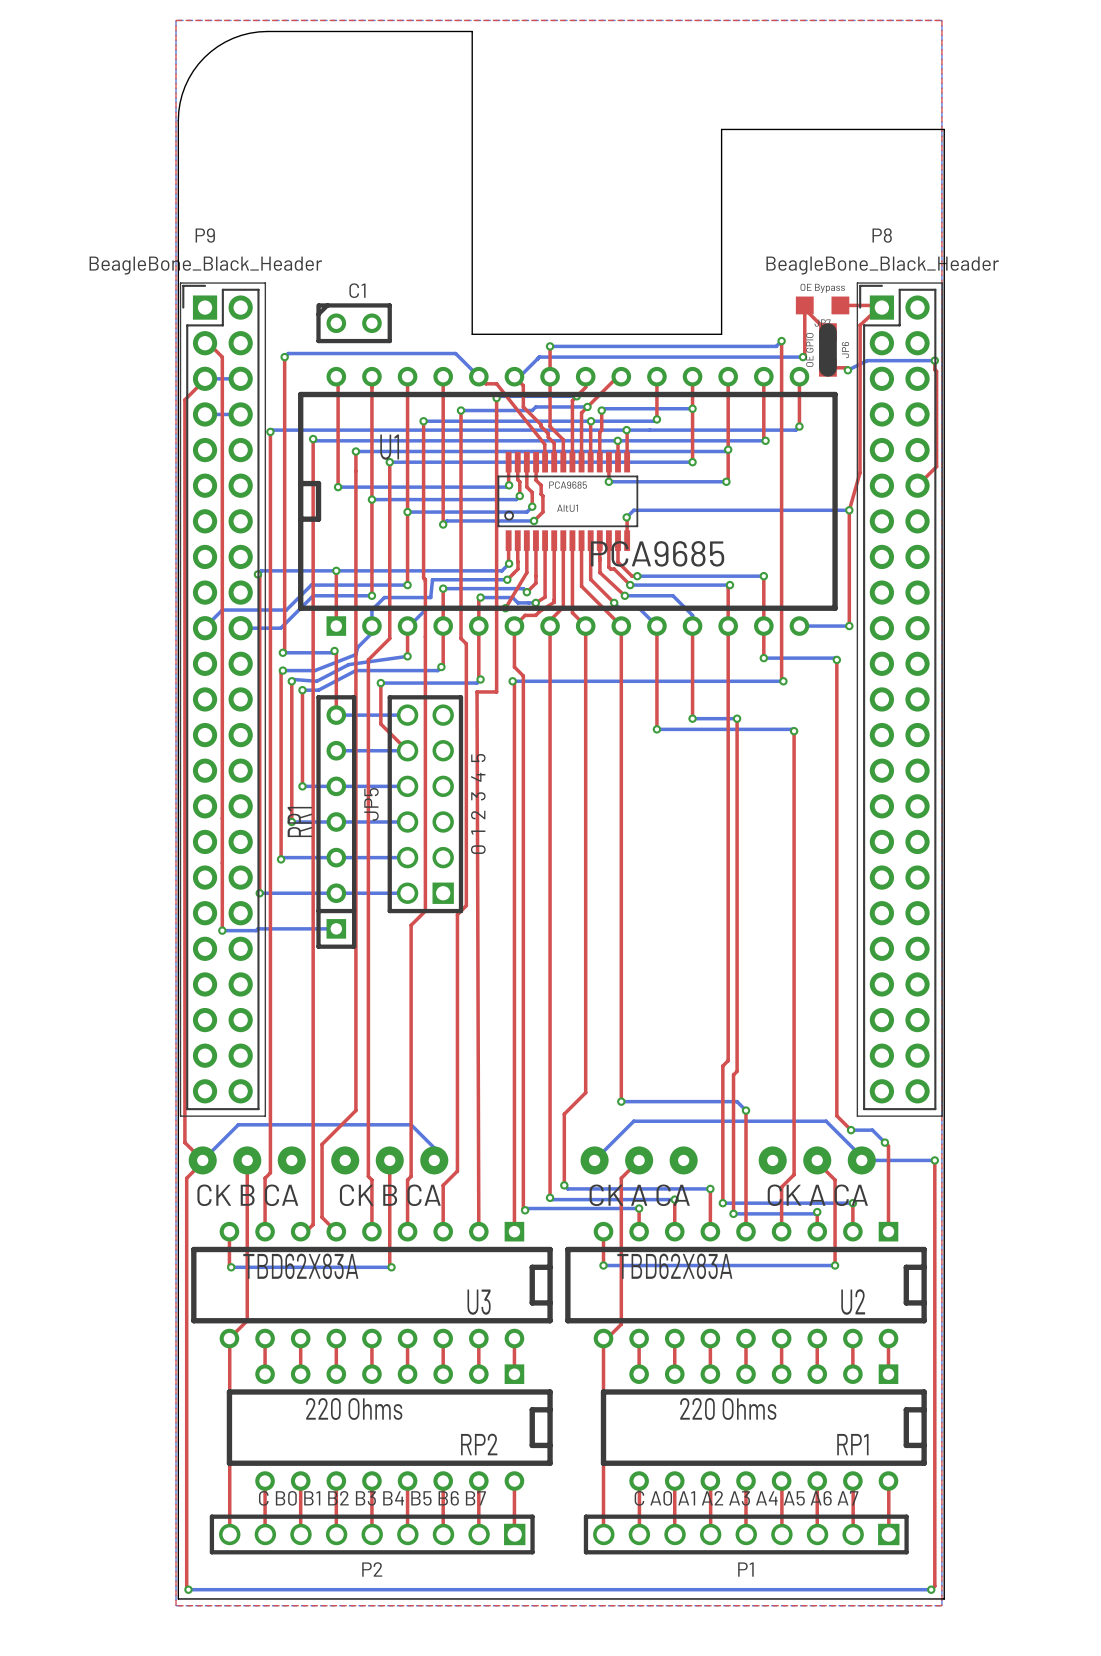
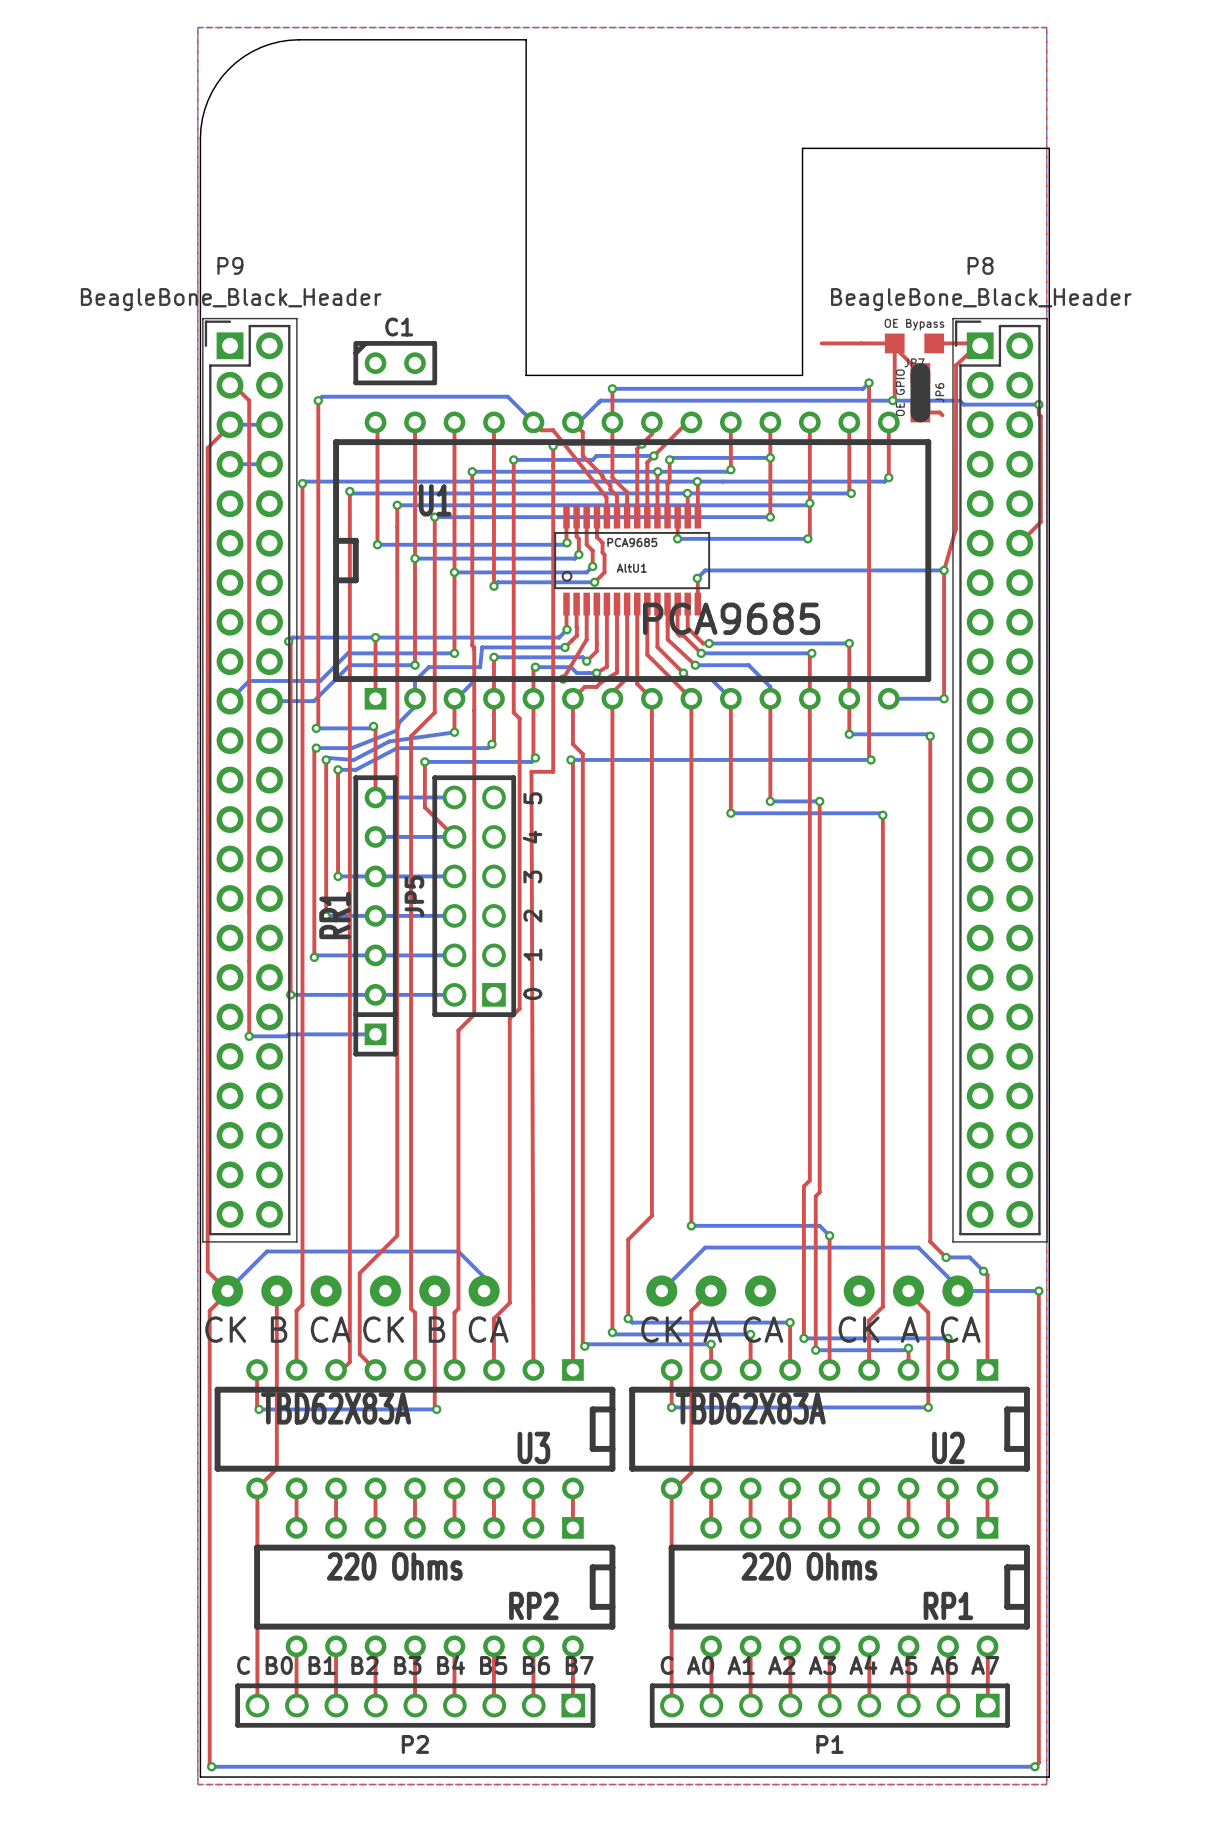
top track: none -> (821, 343) (894, 343)
bottom track: (867, 360) (847, 370) -> (963, 404) (959, 400) (892, 400)
via: (847, 370) -> none

